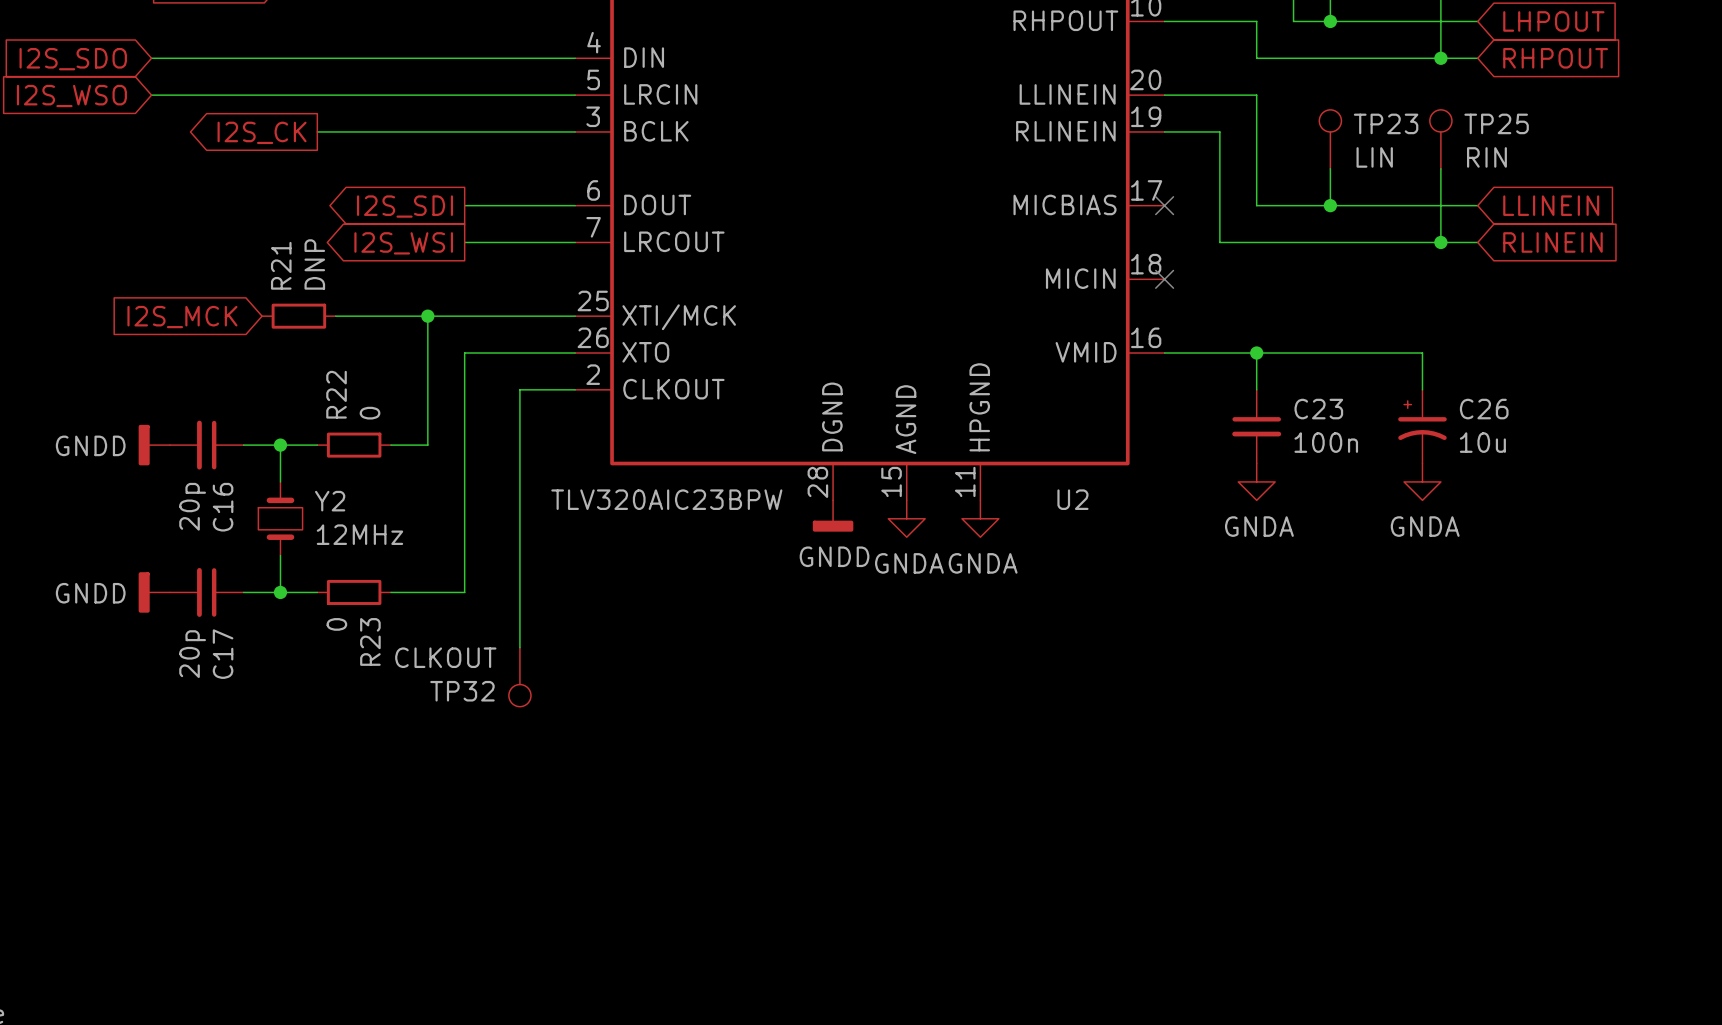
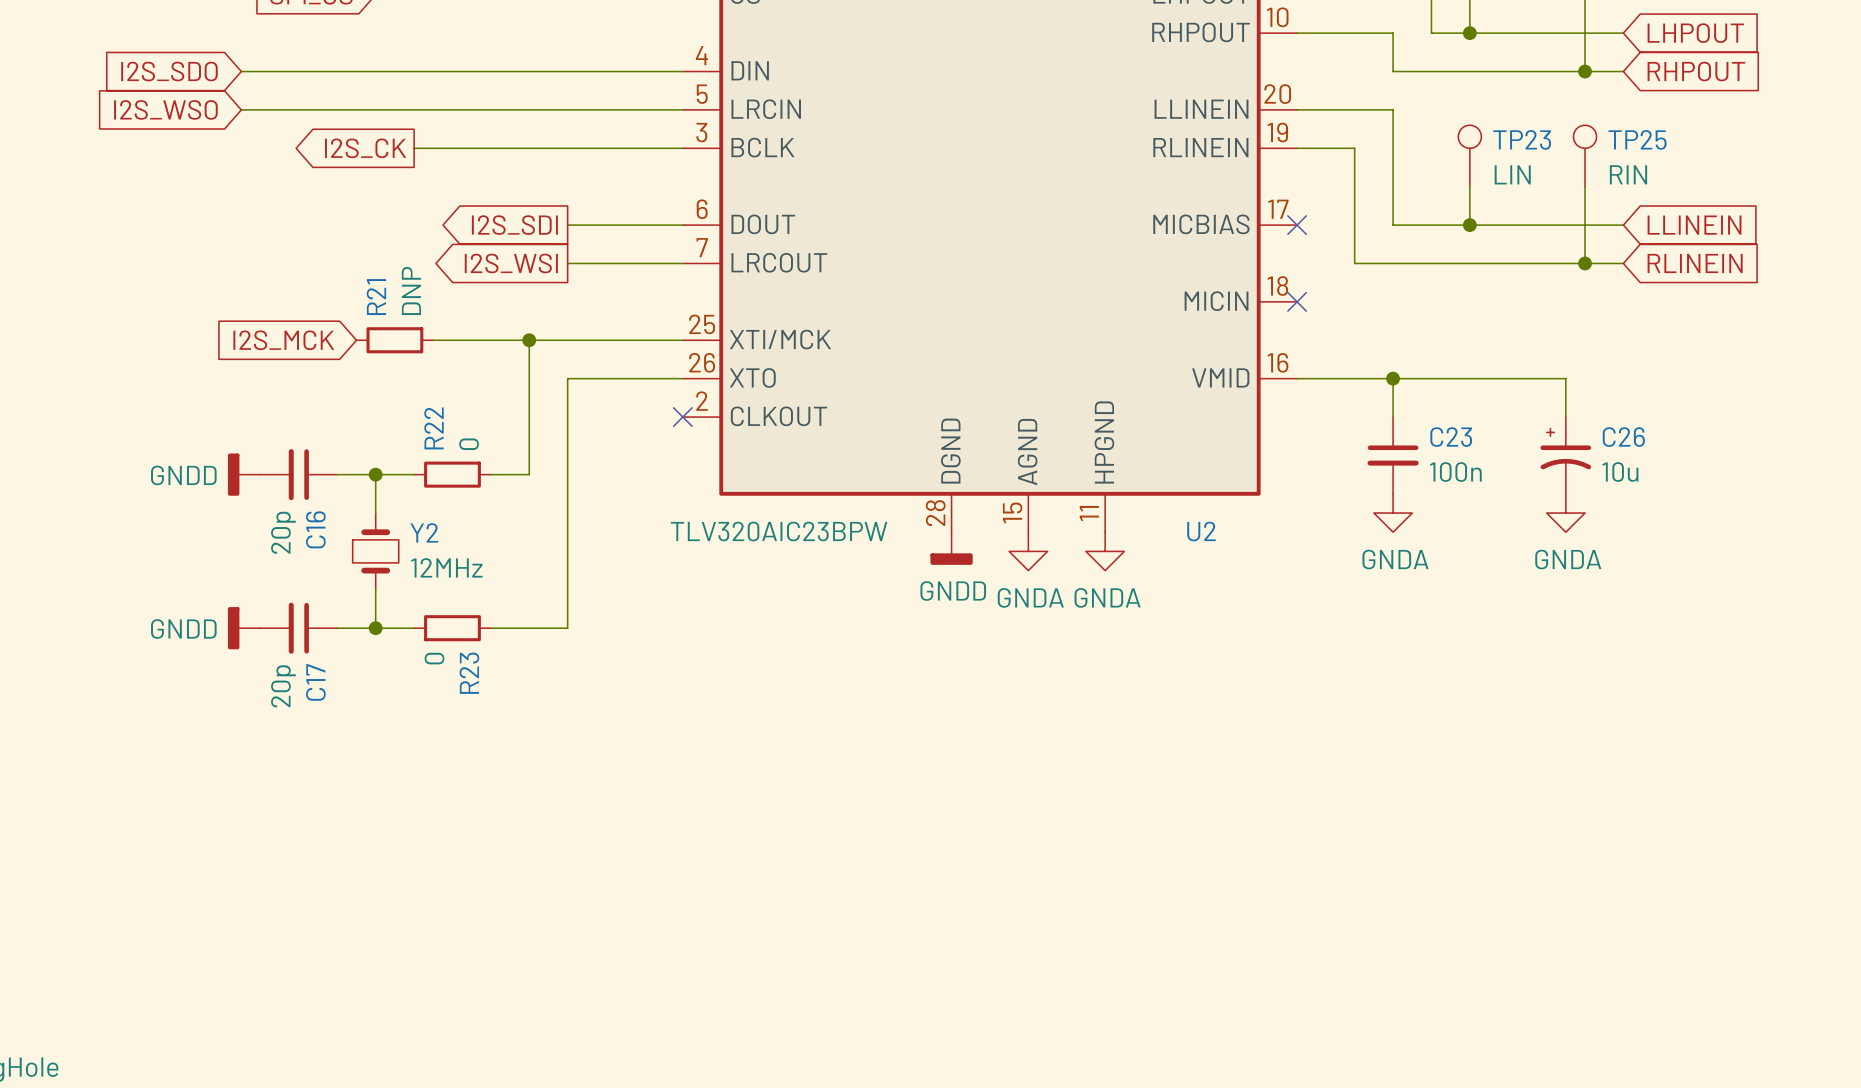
wire: (575, 389) (519, 389) (519, 647) -> none
no-connect mark: none -> (682, 417)
TP32: CLKOUT (519, 677) -> none

